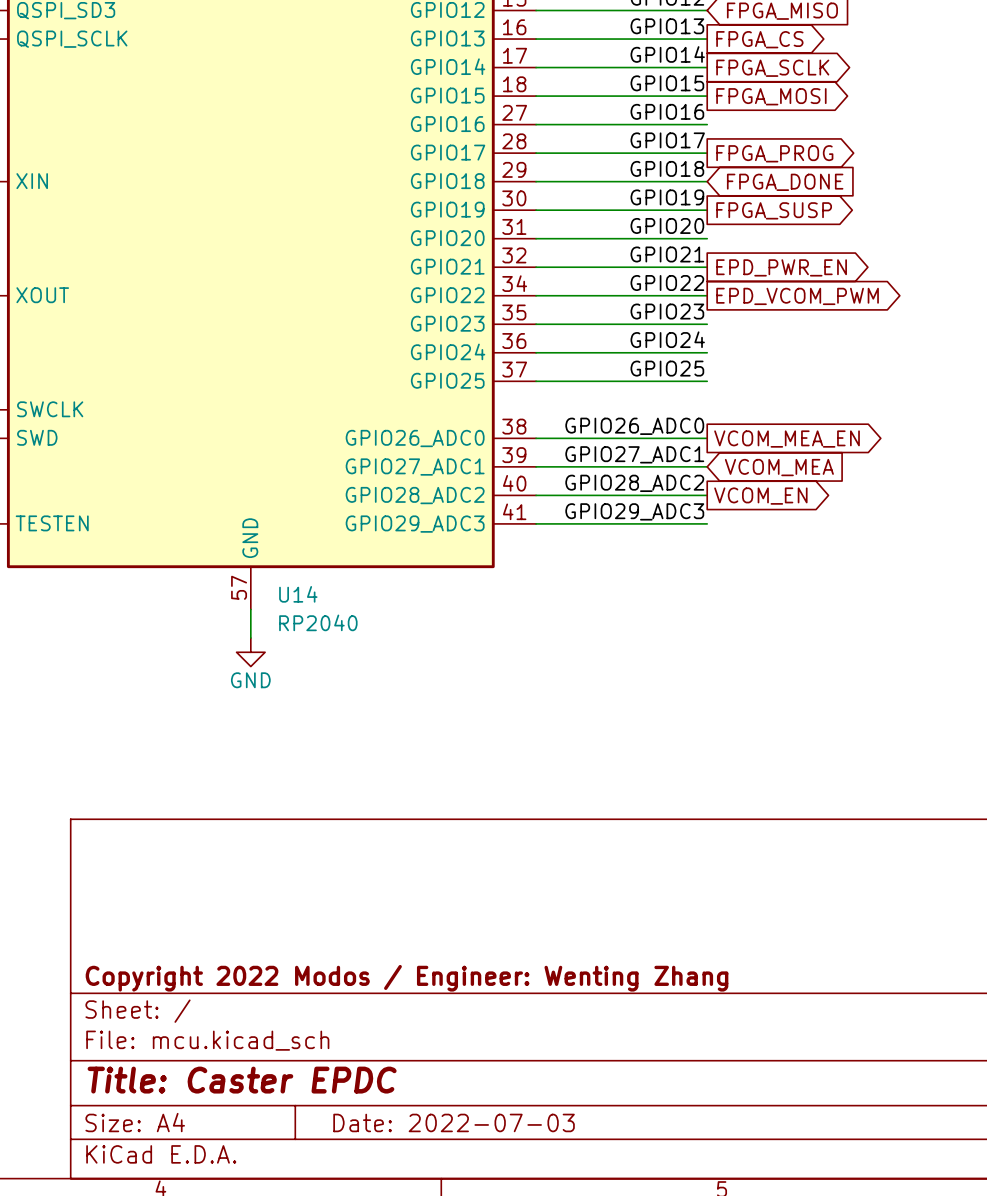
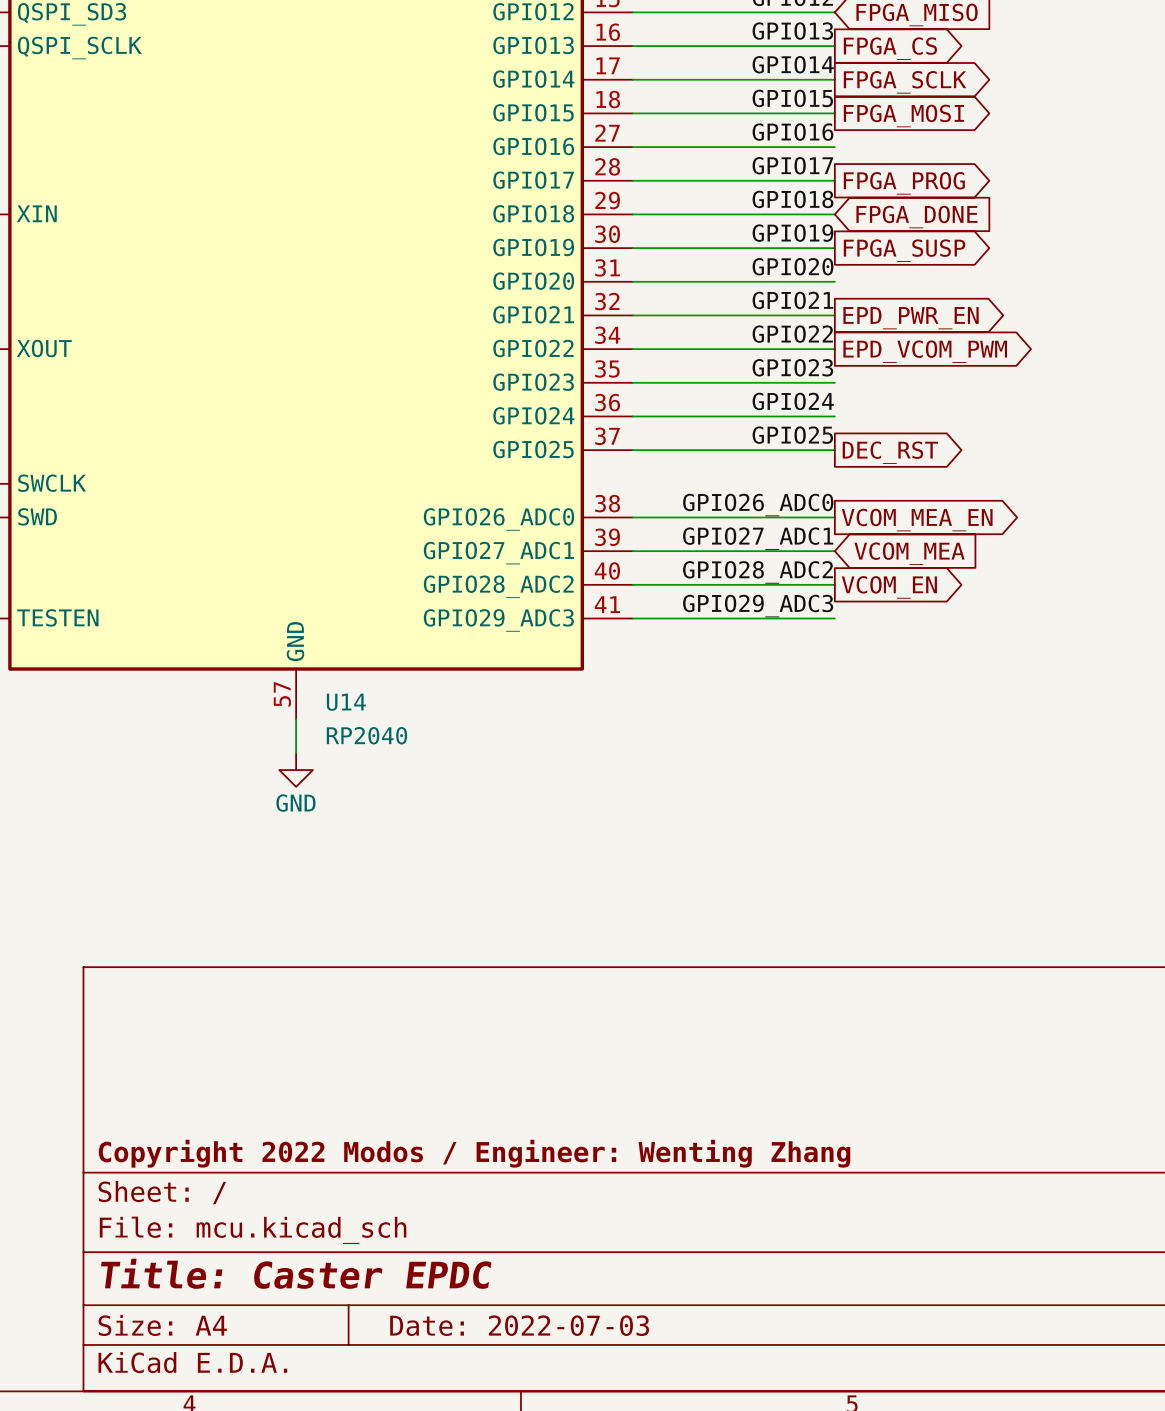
global label: none -> DEC_RST (890, 452)

